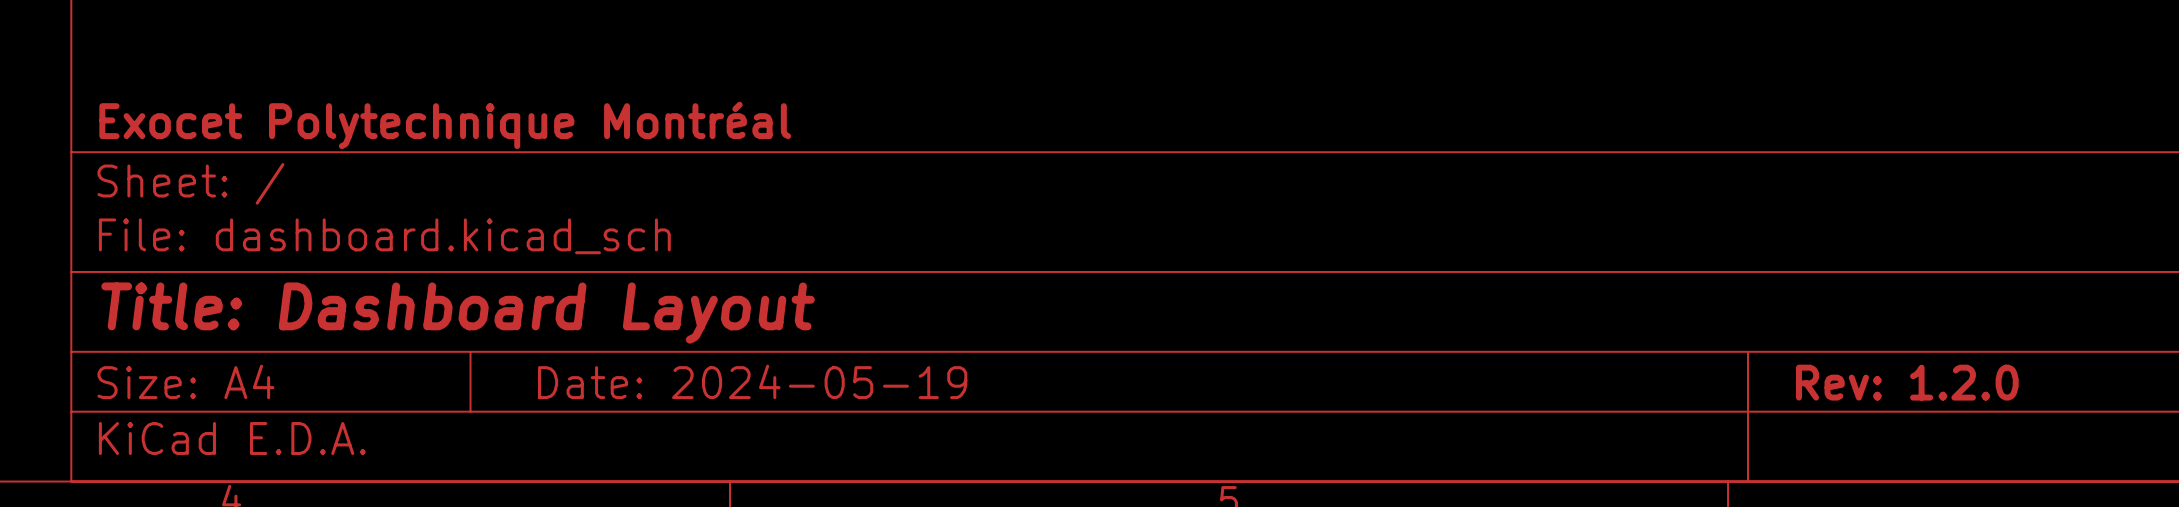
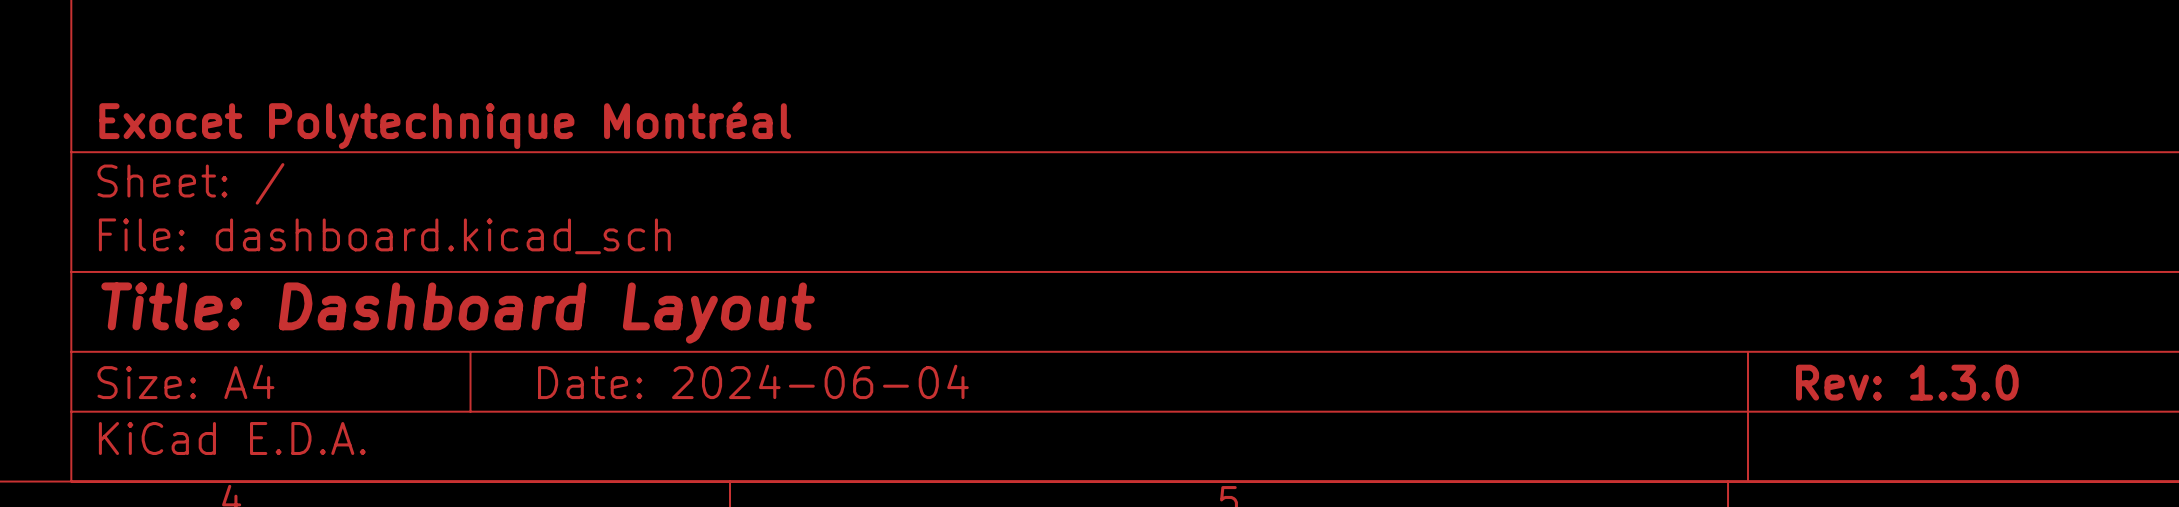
title block: Date: 2024-05-19 (752, 381) -> Date: 2024-06-04 (753, 381)
title block: Rev: 1.2.0 (1907, 382) -> Rev: 1.3.0 (1907, 382)

